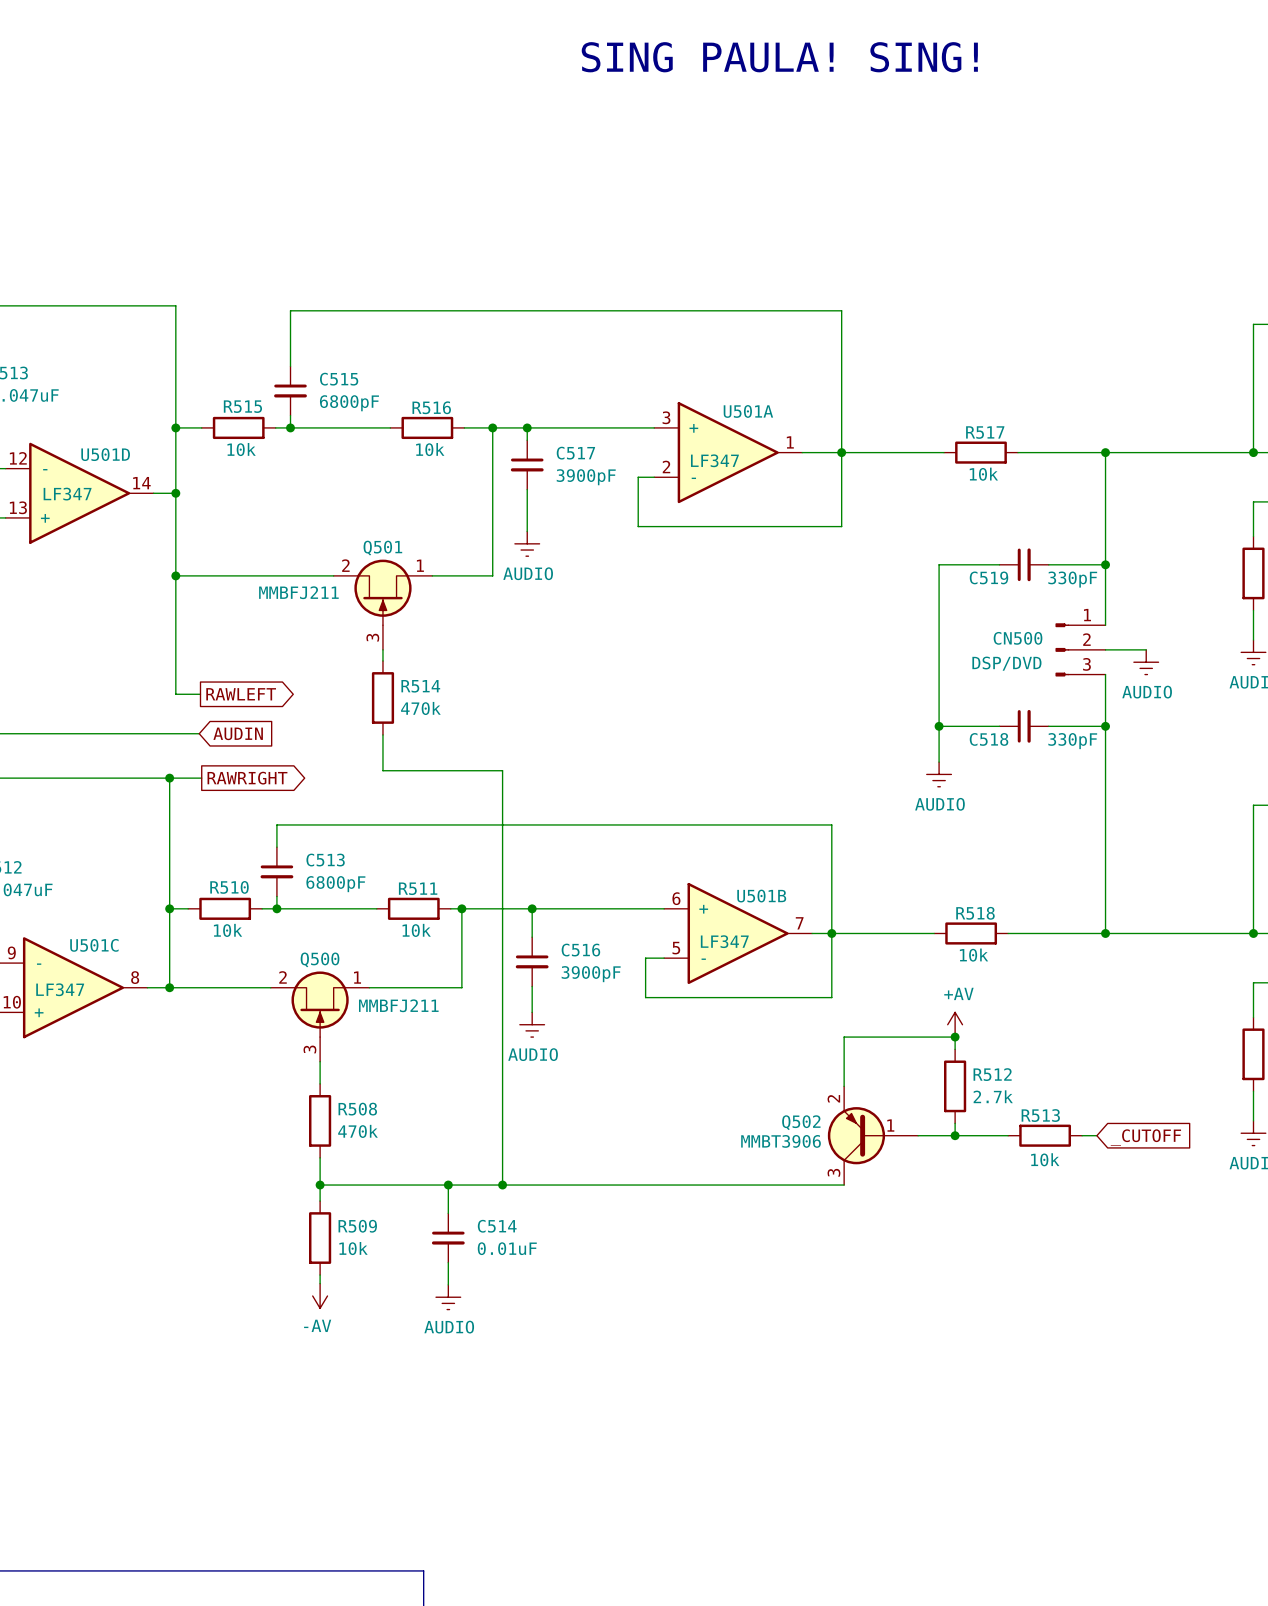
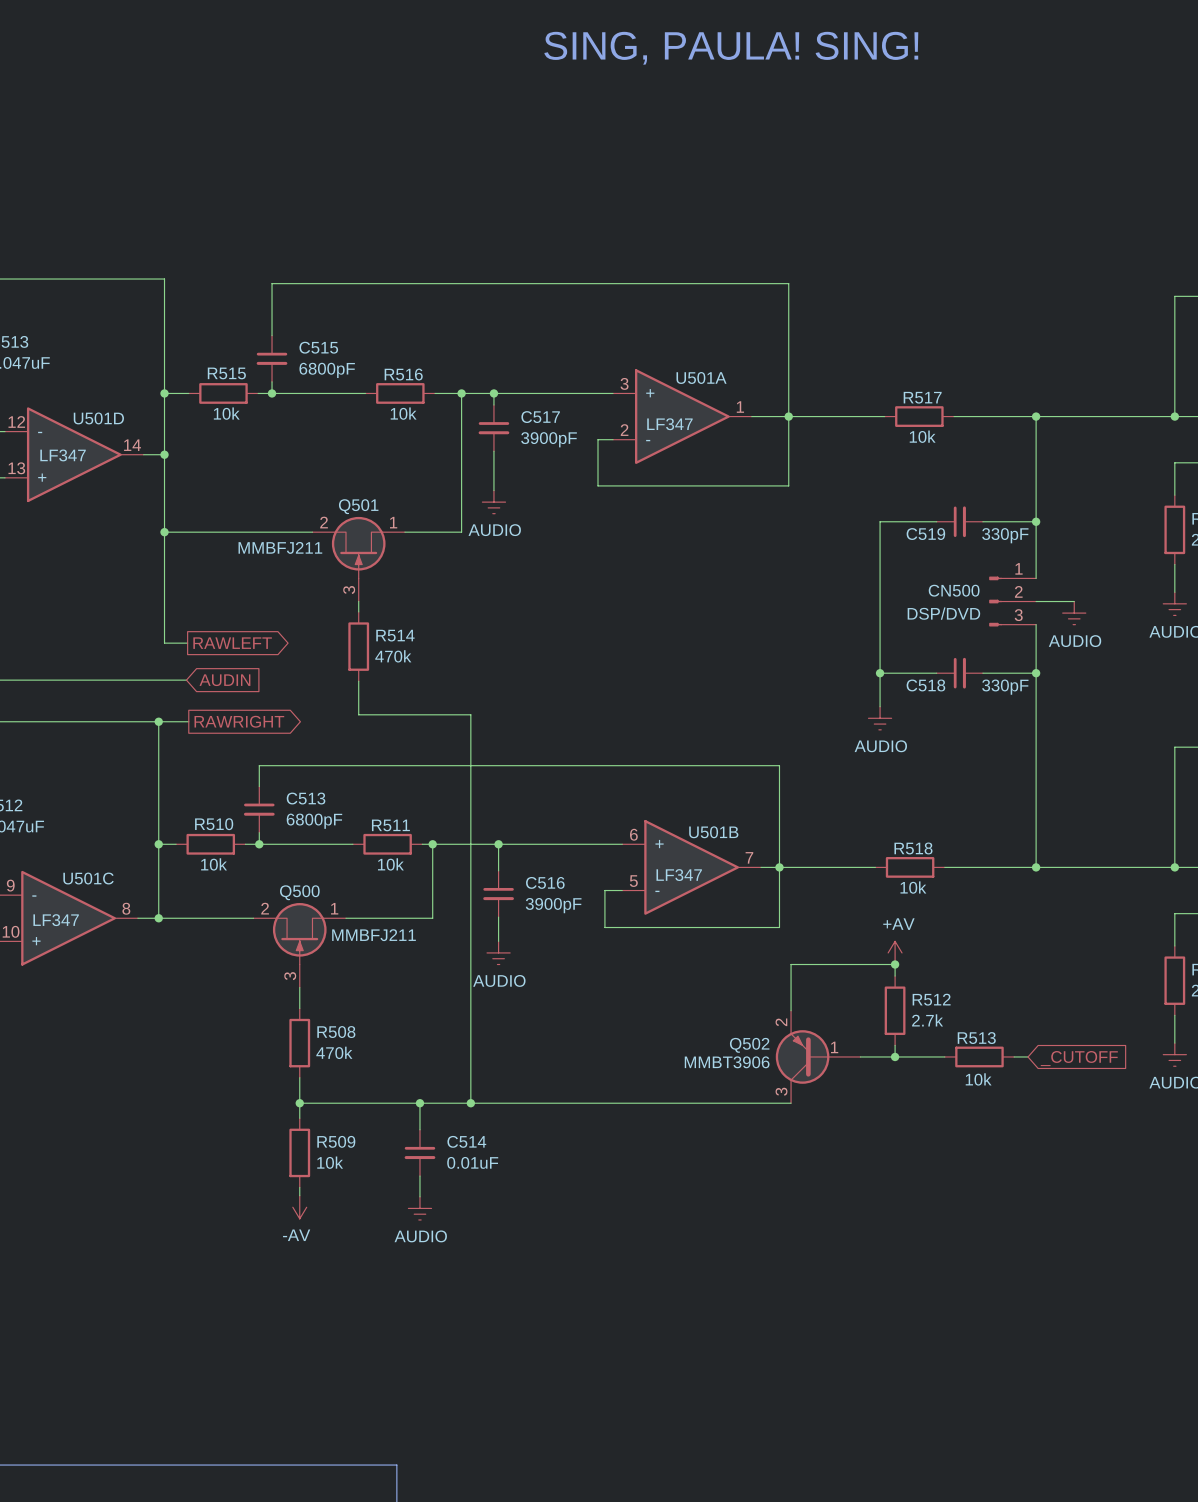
text: SING PAULA! SING! (779, 57) -> SING, PAULA! SING! (731, 48)

